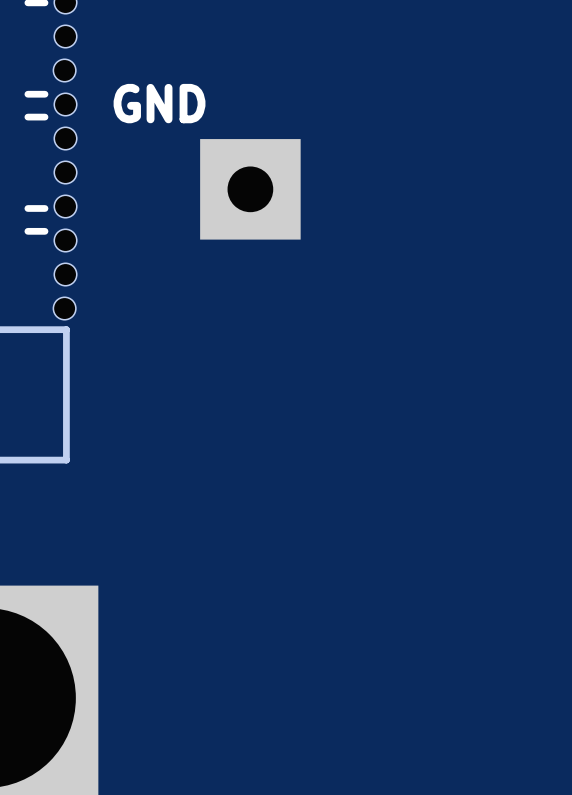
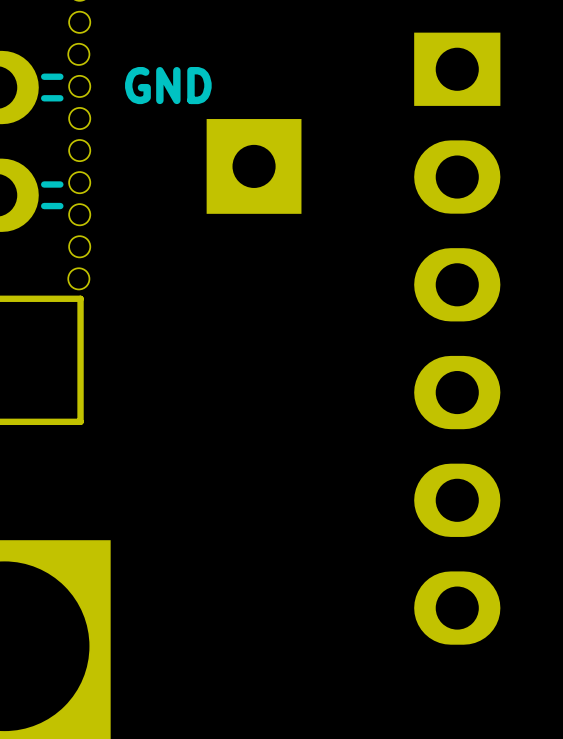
part: none -> (457, 338)

